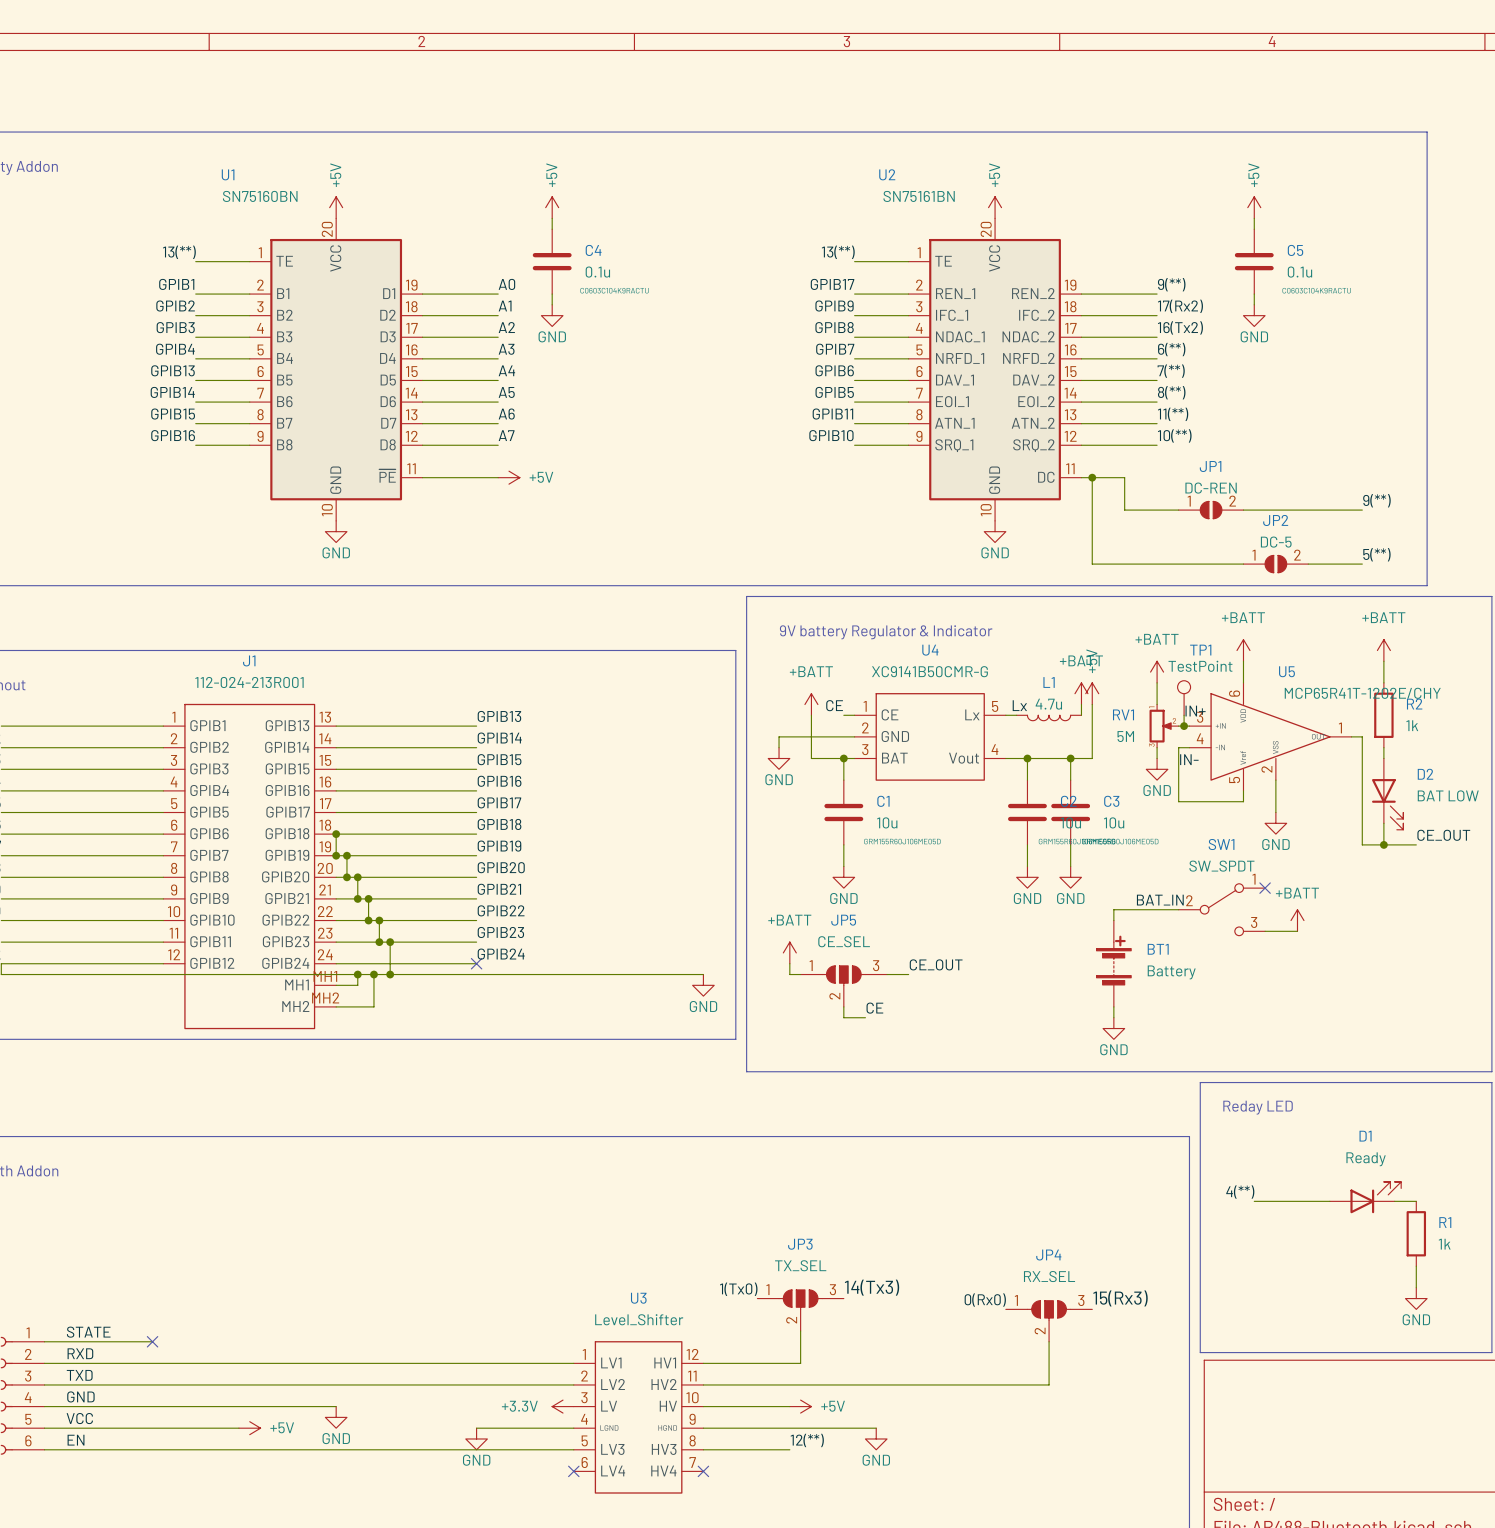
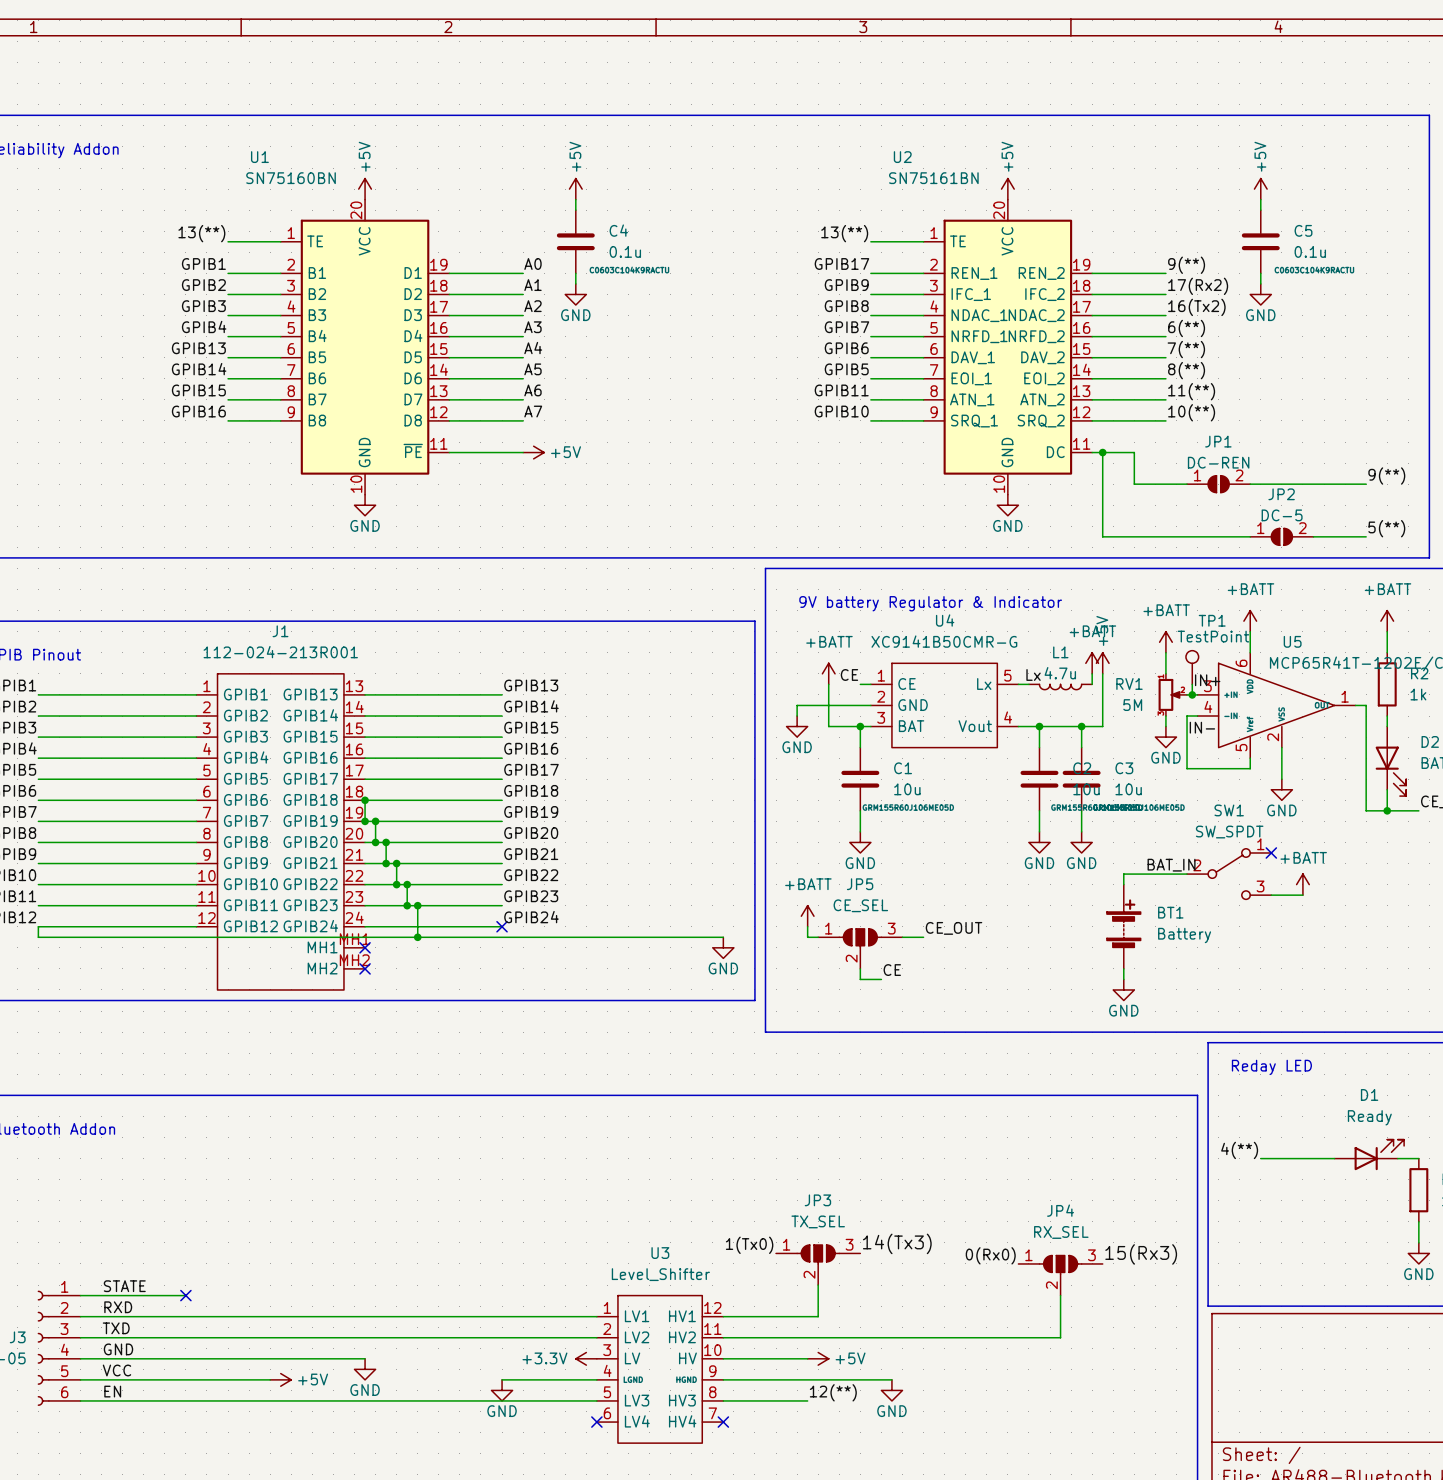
wire: (357, 974) (357, 985) (336, 985) -> none
junction: (357, 974) -> none
wire: (373, 974) (373, 1006) (336, 1006) -> none
junction: (373, 974) -> none
no-connect mark: none -> (365, 947)
no-connect mark: none -> (365, 968)

